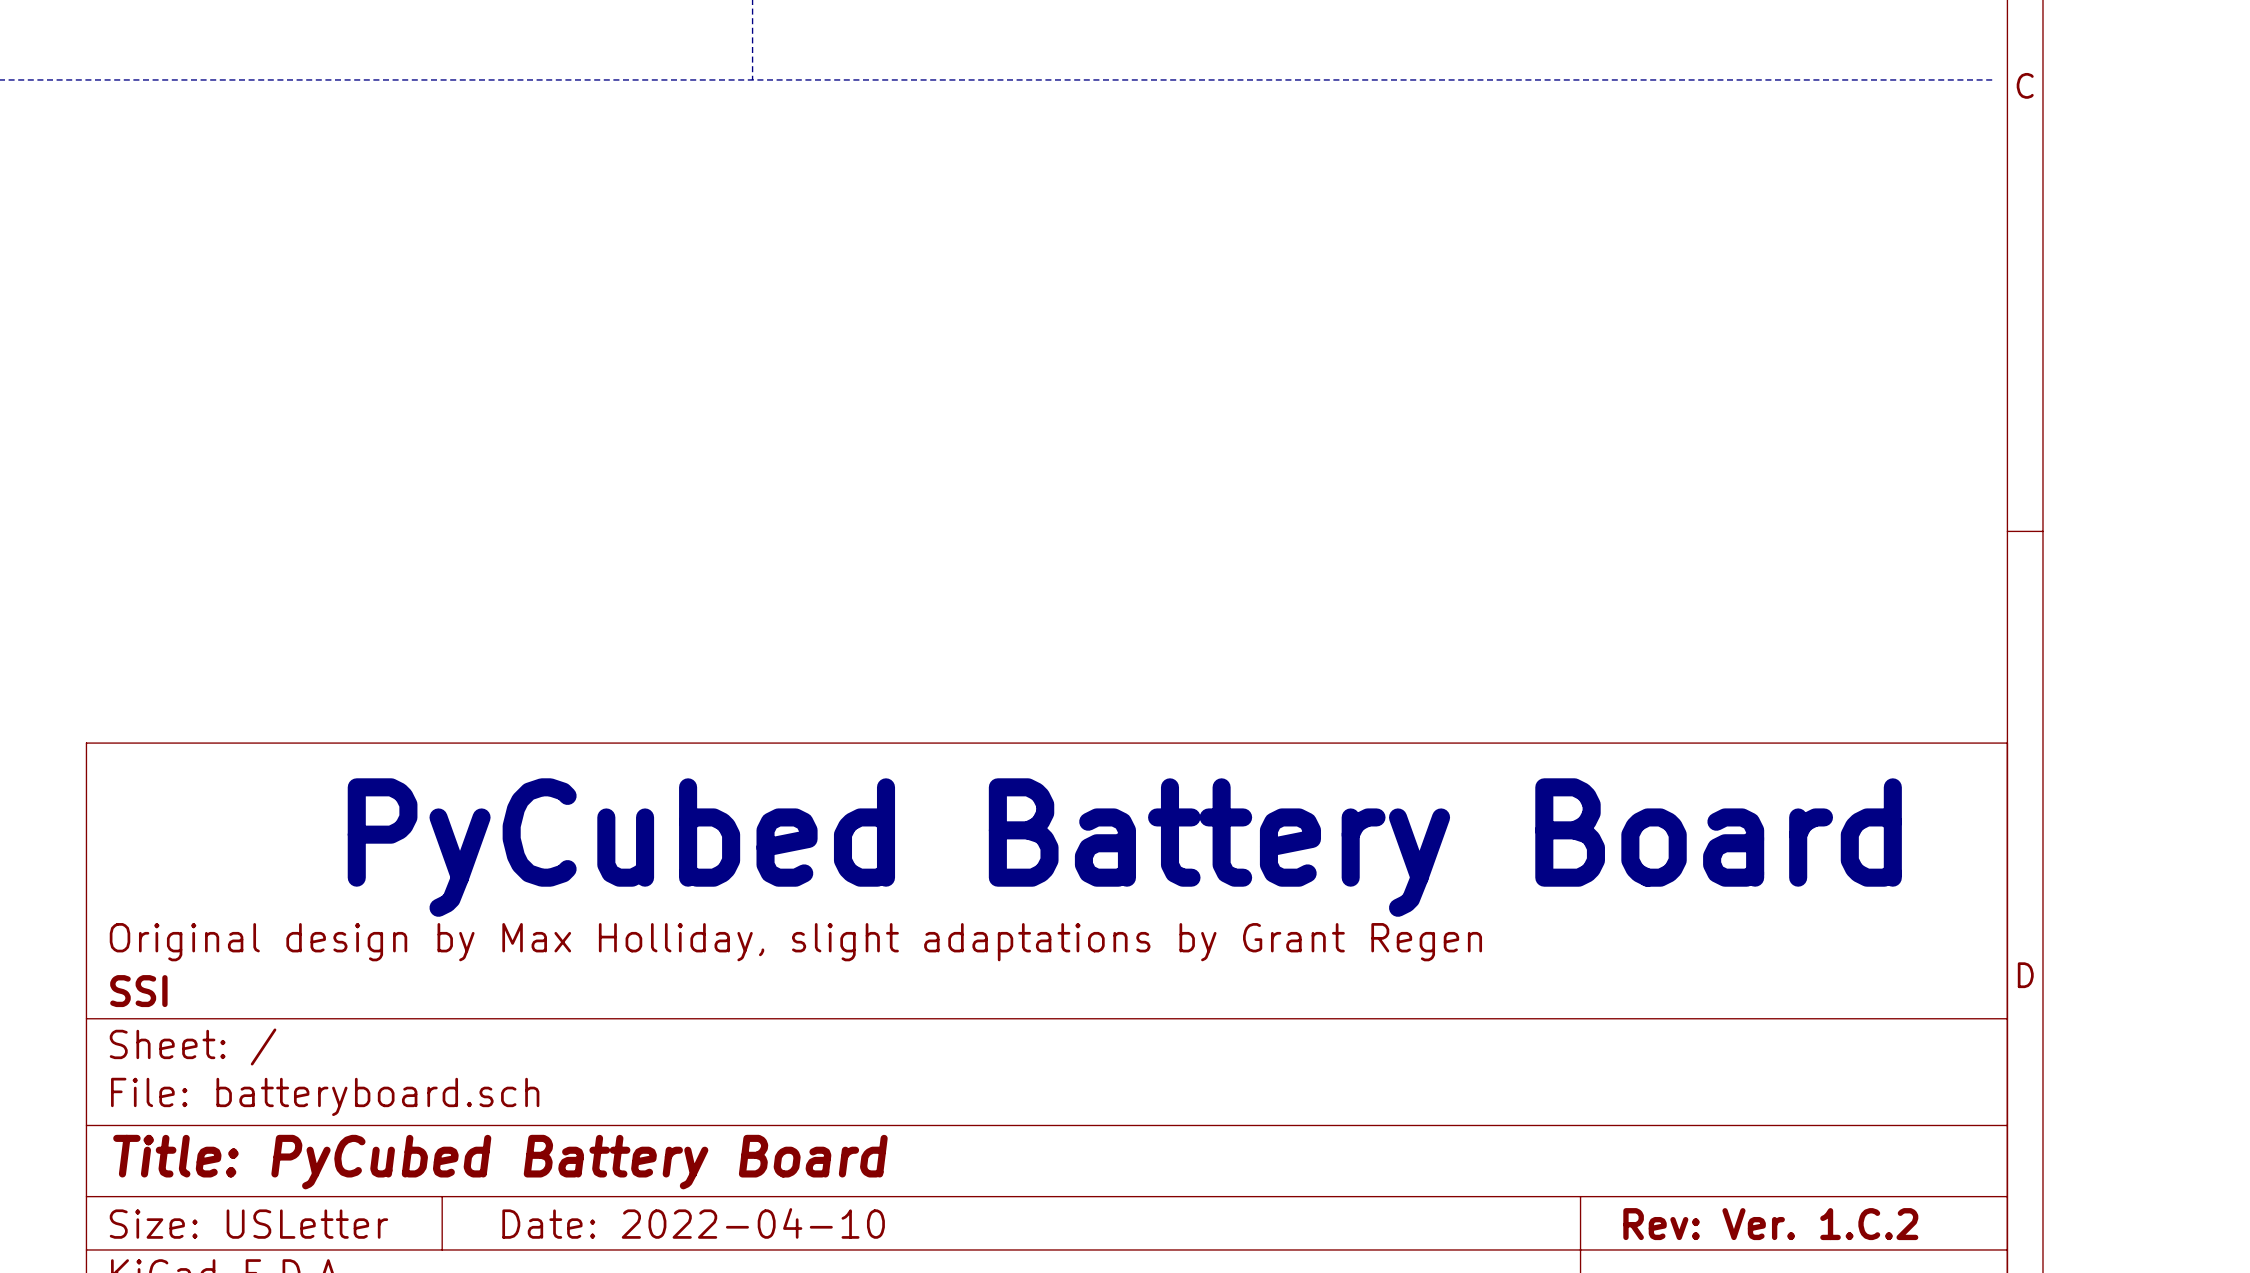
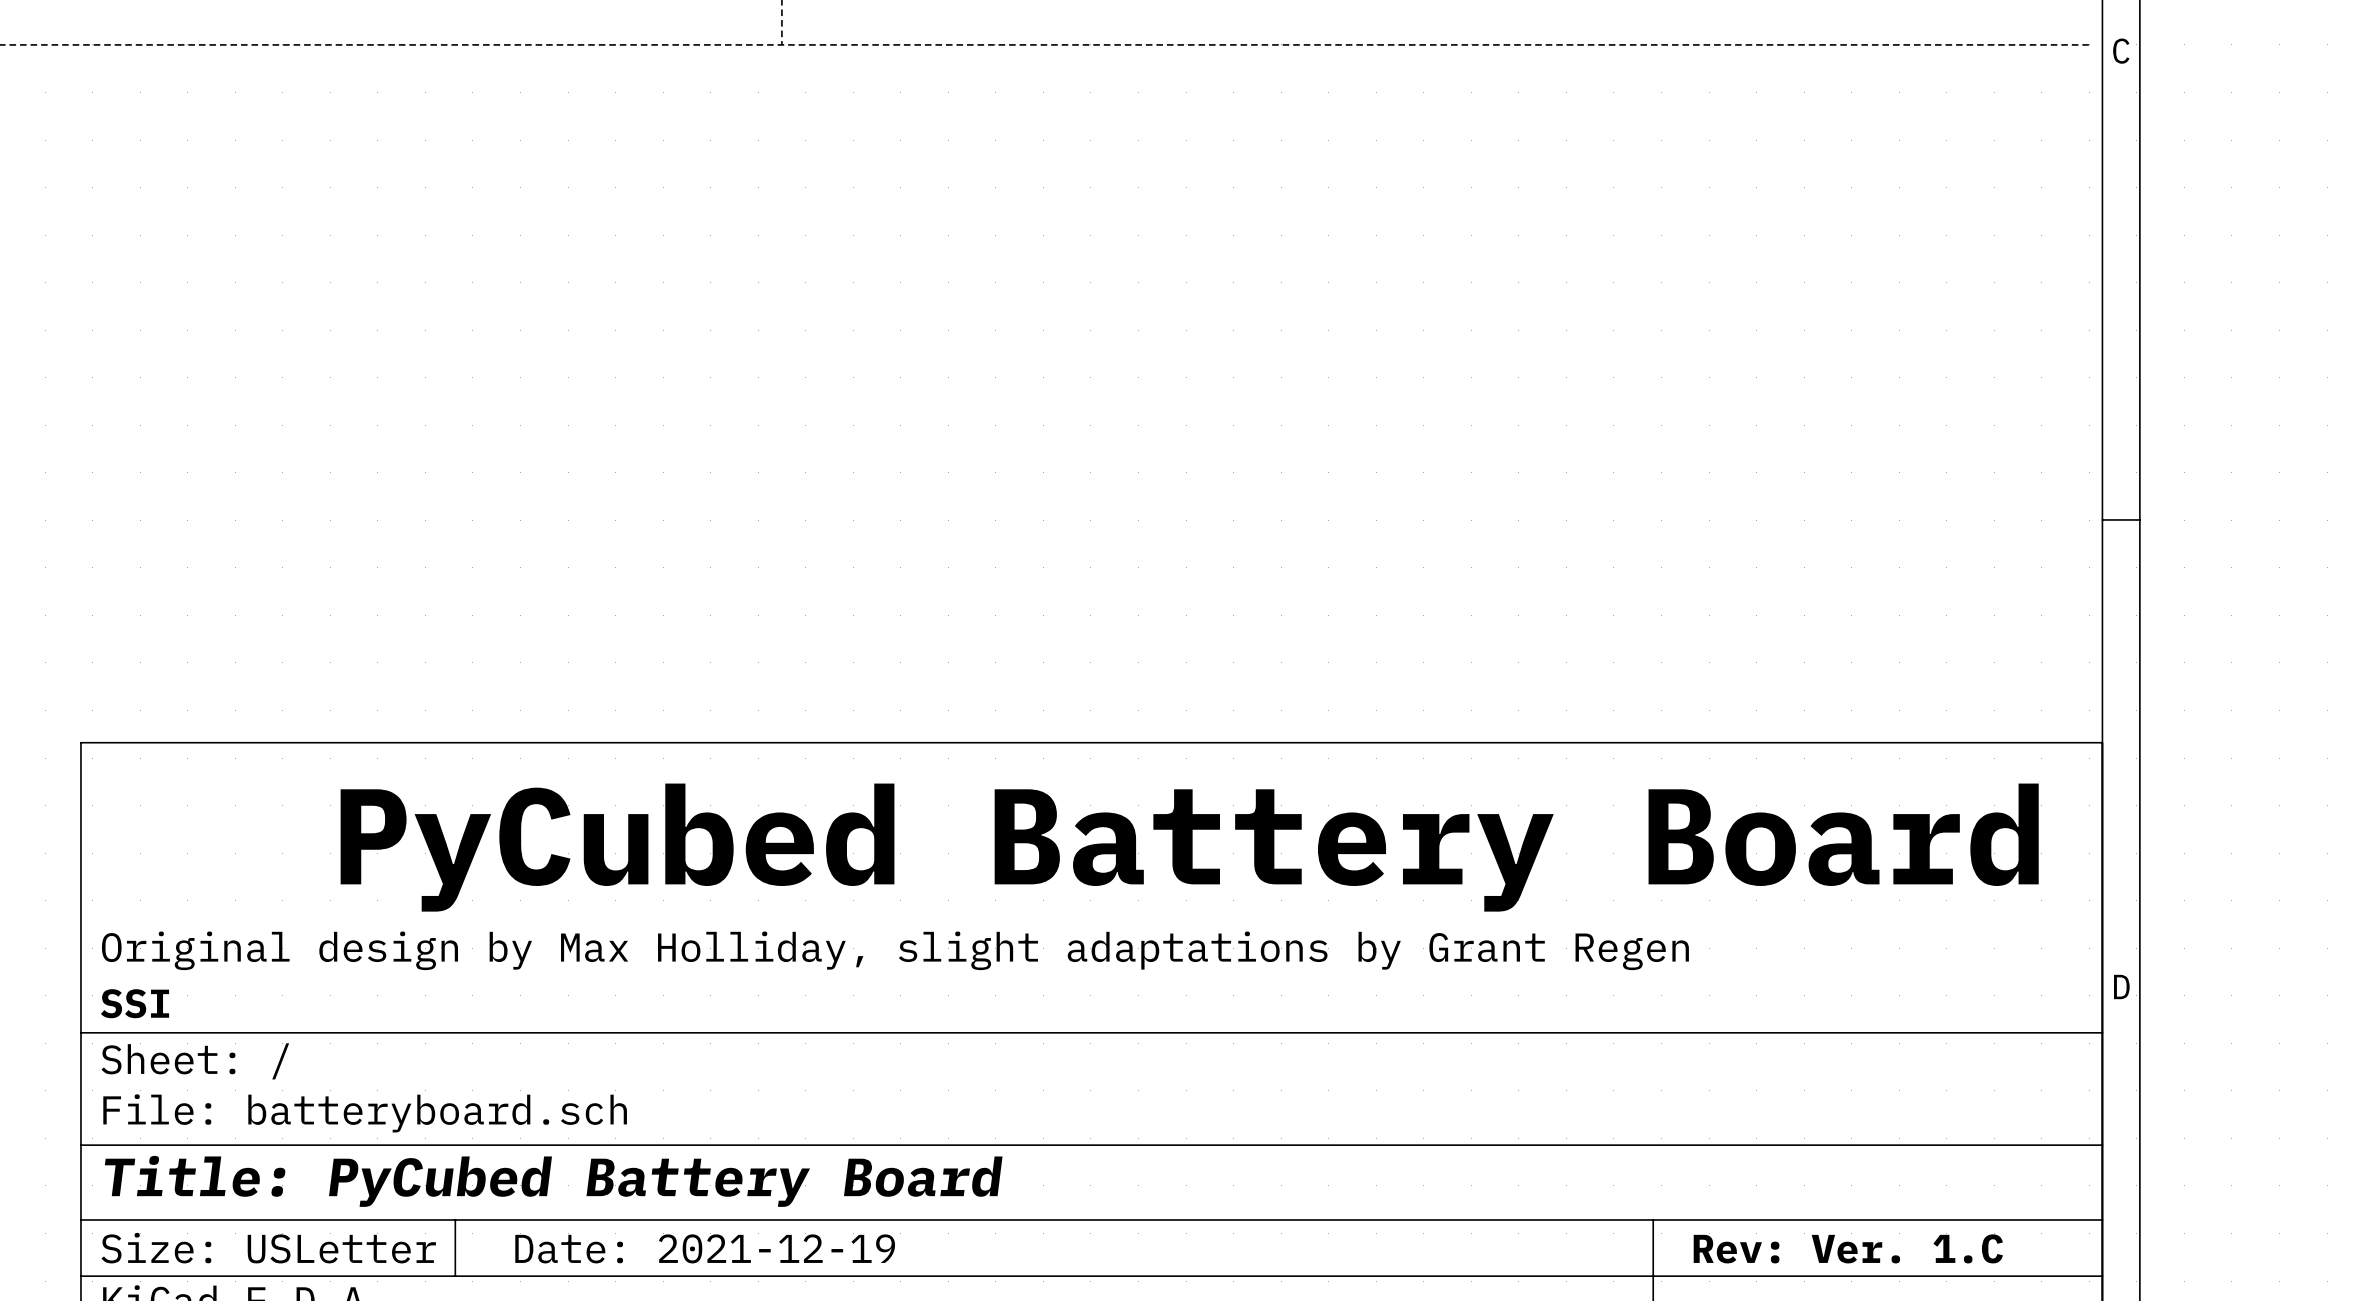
title block: Date: 2022-04-10 (693, 1223) -> Date: 2021-12-19 (705, 1248)
title block: Rev: Ver. 1.C.2 (1770, 1224) -> Rev: Ver. 1.C (1848, 1248)

